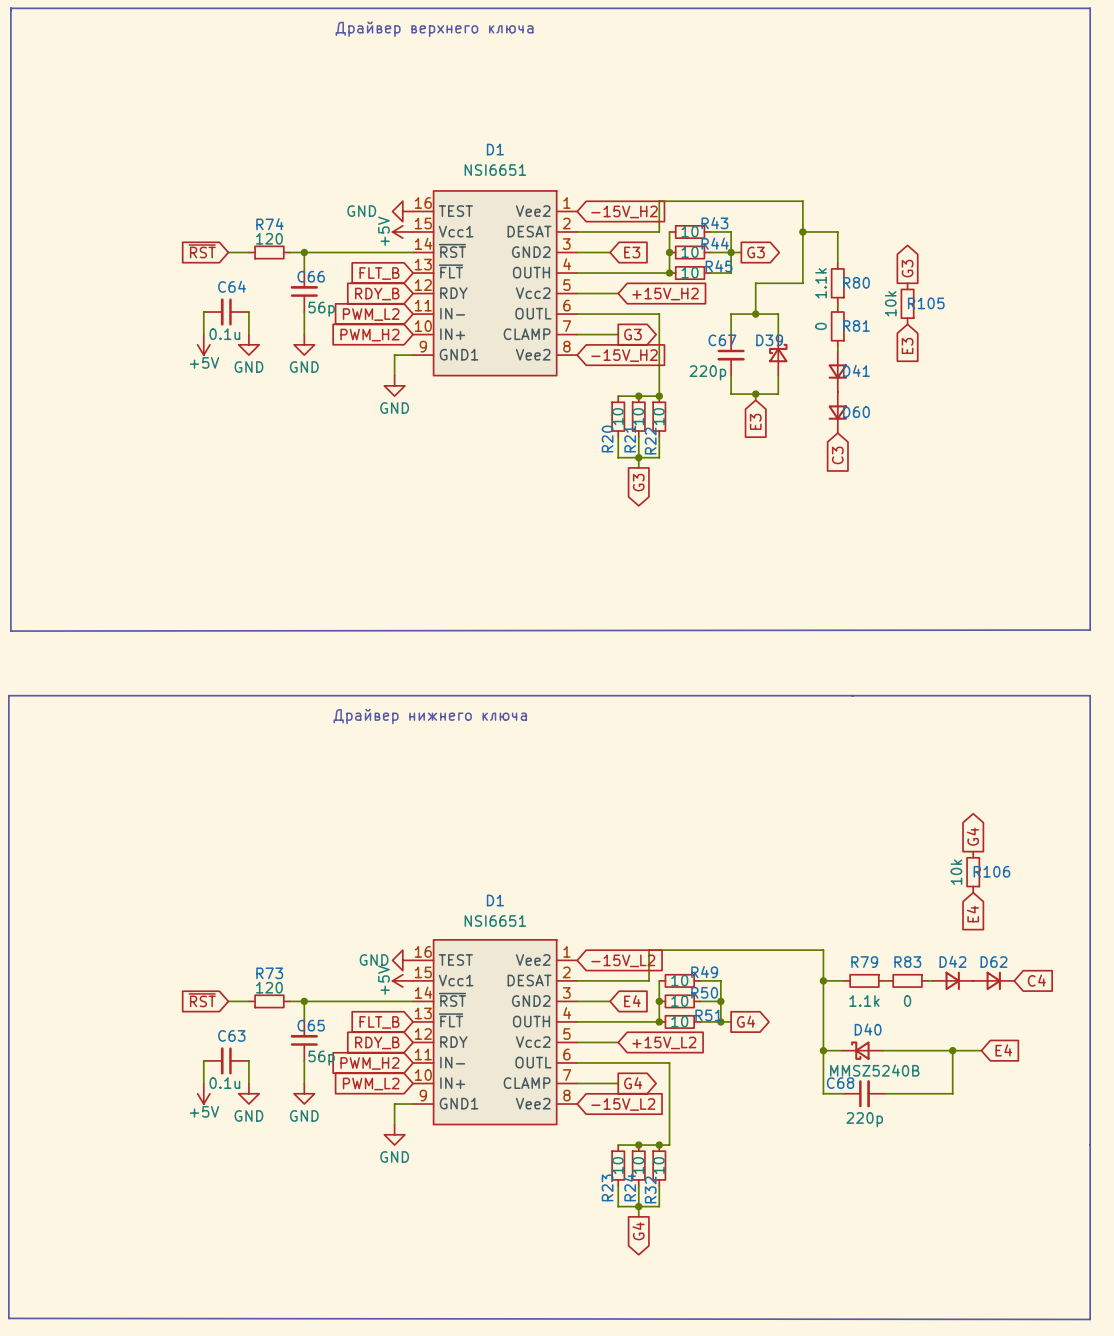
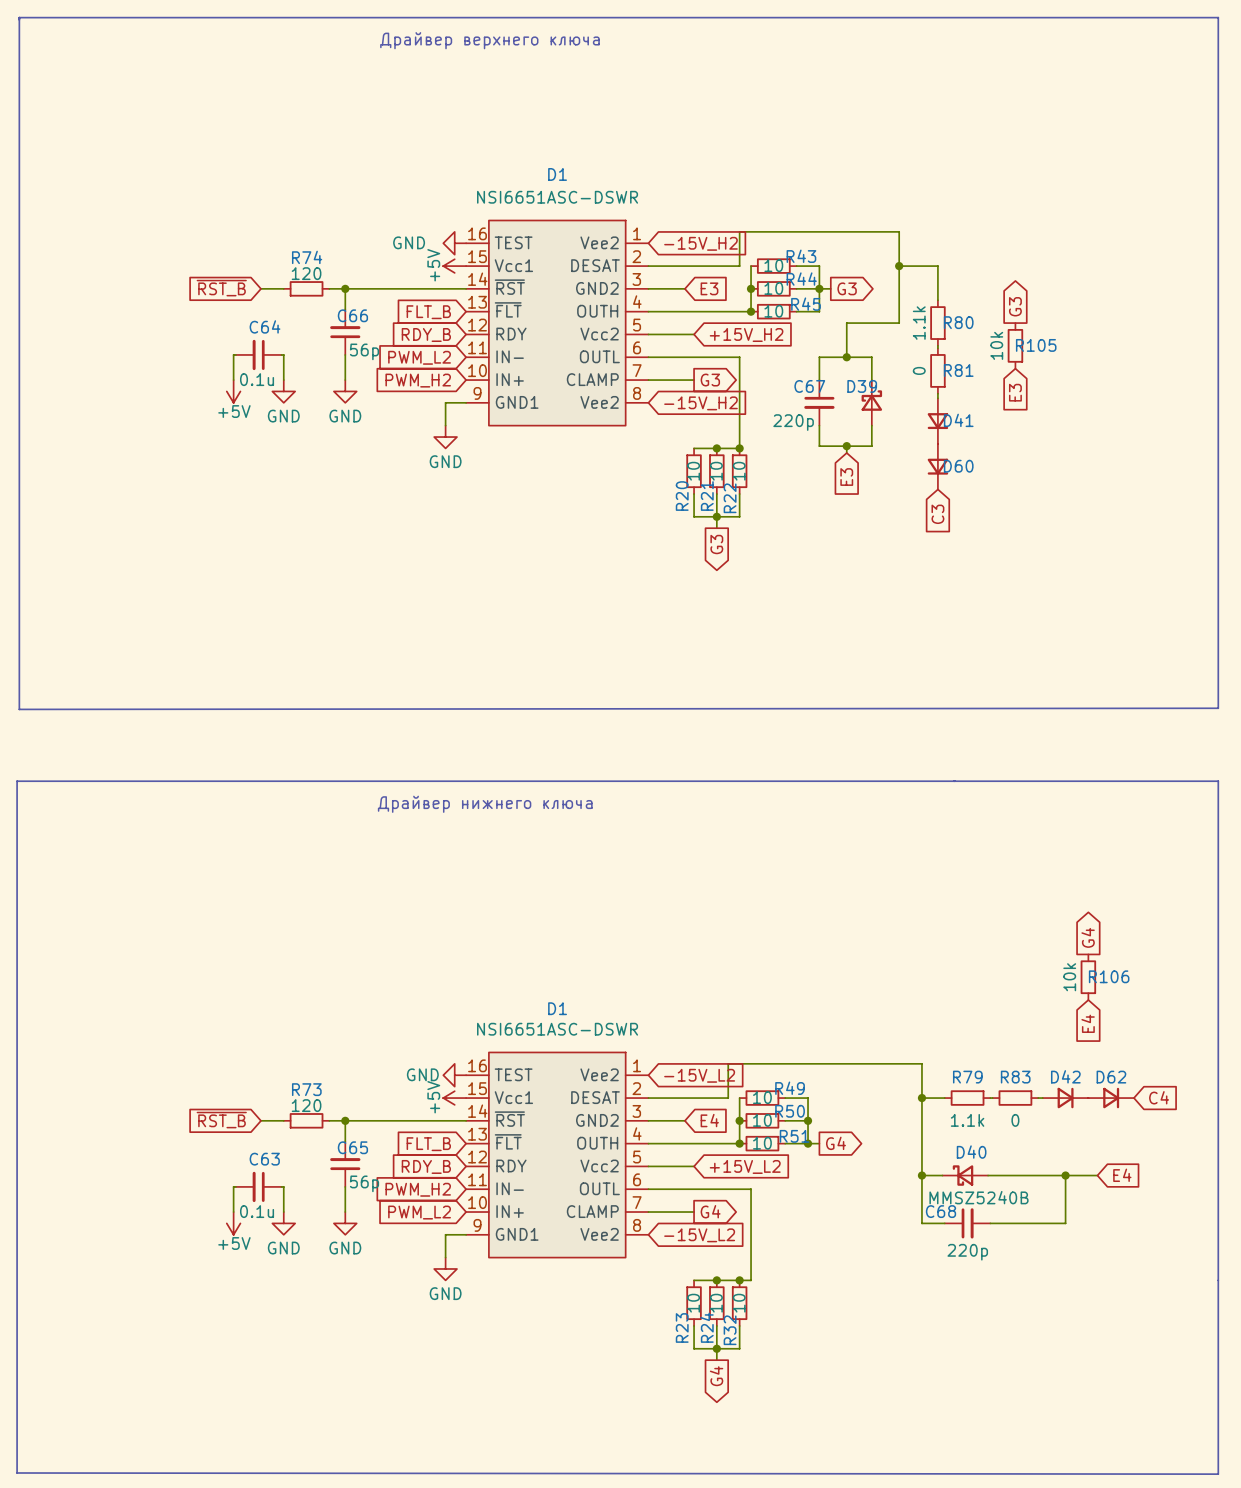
D1 value: NSI6651 (495, 170) -> NSI6651ASC-DSWR (557, 197)
global label: ~{RST} (202, 251) -> ~{RST_B} (221, 288)
D1 value: NSI6651 (495, 921) -> NSI6651ASC-DSWR (557, 1029)
global label: ~{RST} (202, 1000) -> ~{RST_B} (221, 1120)

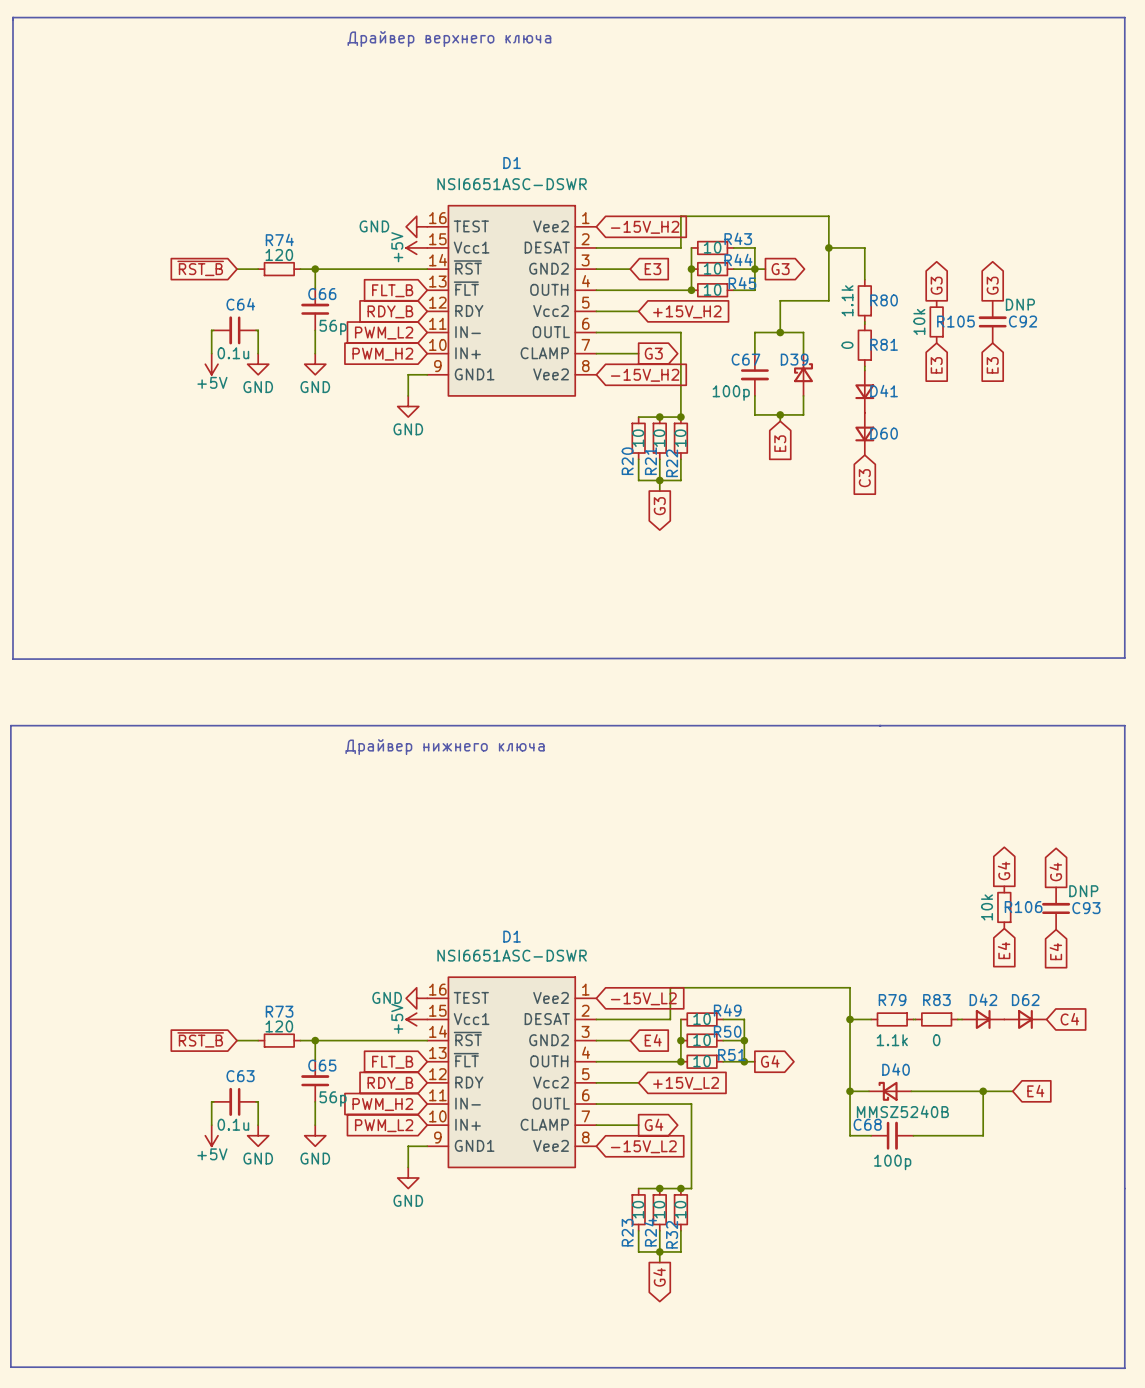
global label: none -> G3 (992, 285)
C92: none -> DNP (992, 321)
global label: none -> E3 (992, 365)
C67 value: 220p (793, 422) -> 100p (731, 393)
global label: none -> G4 (1055, 871)
C93: none -> DNP (1056, 908)
global label: none -> E4 (1055, 951)
C68 value: 220p (967, 1252) -> 100p (892, 1162)

